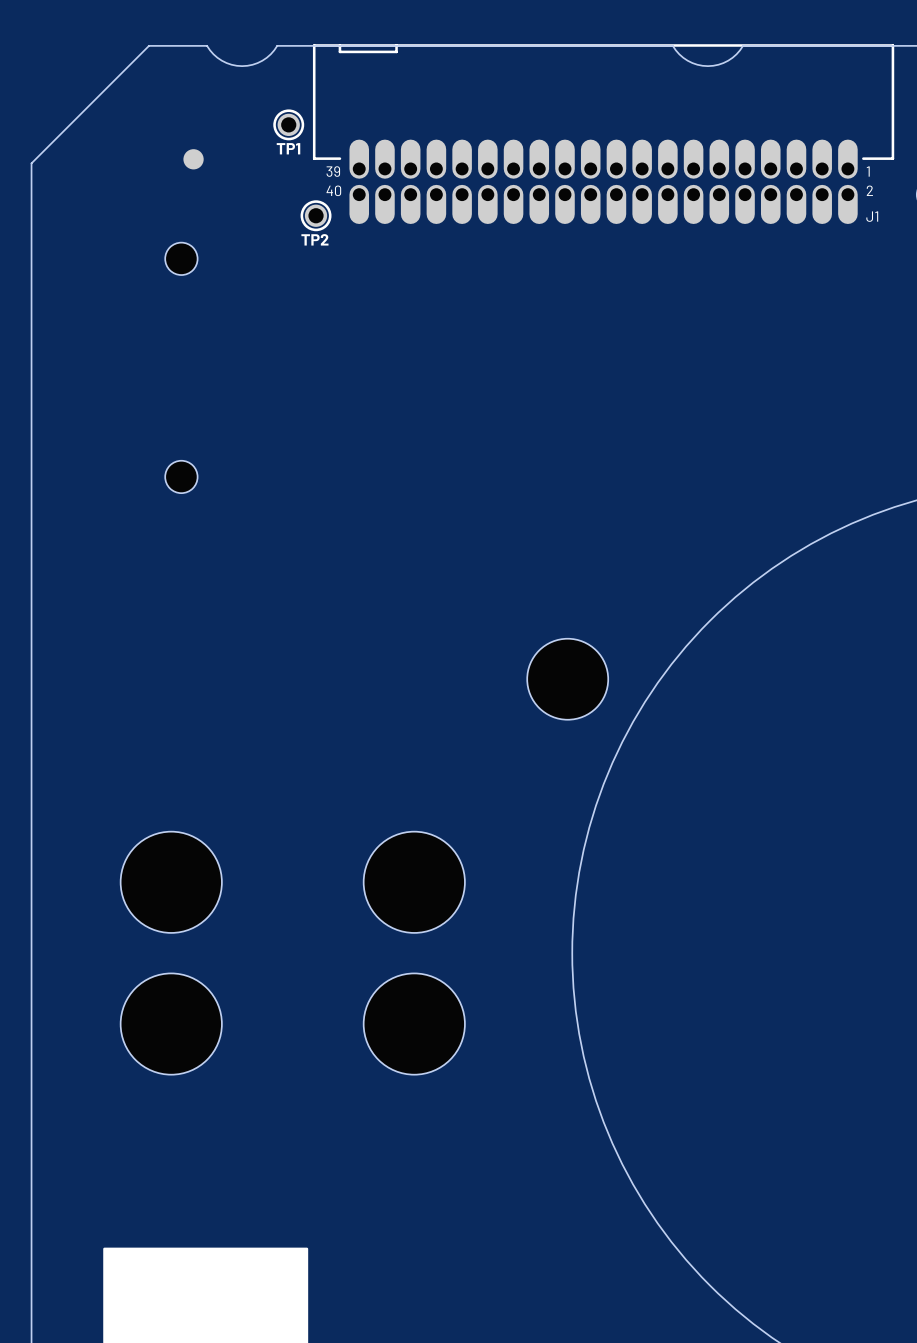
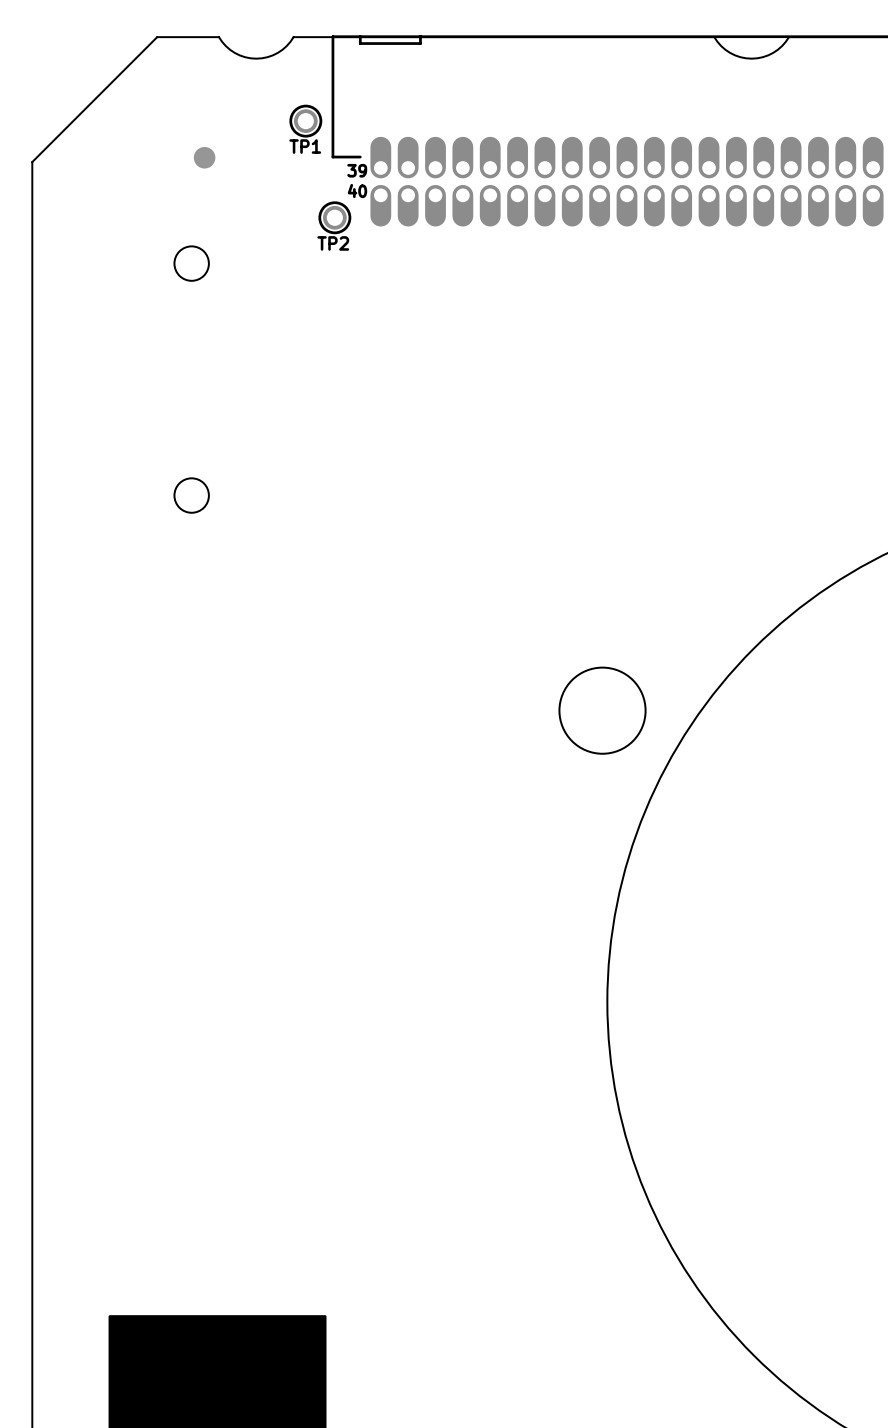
part: (171, 882) -> none
part: (414, 882) -> none
part: (171, 1024) -> none
part: (414, 1024) -> none

